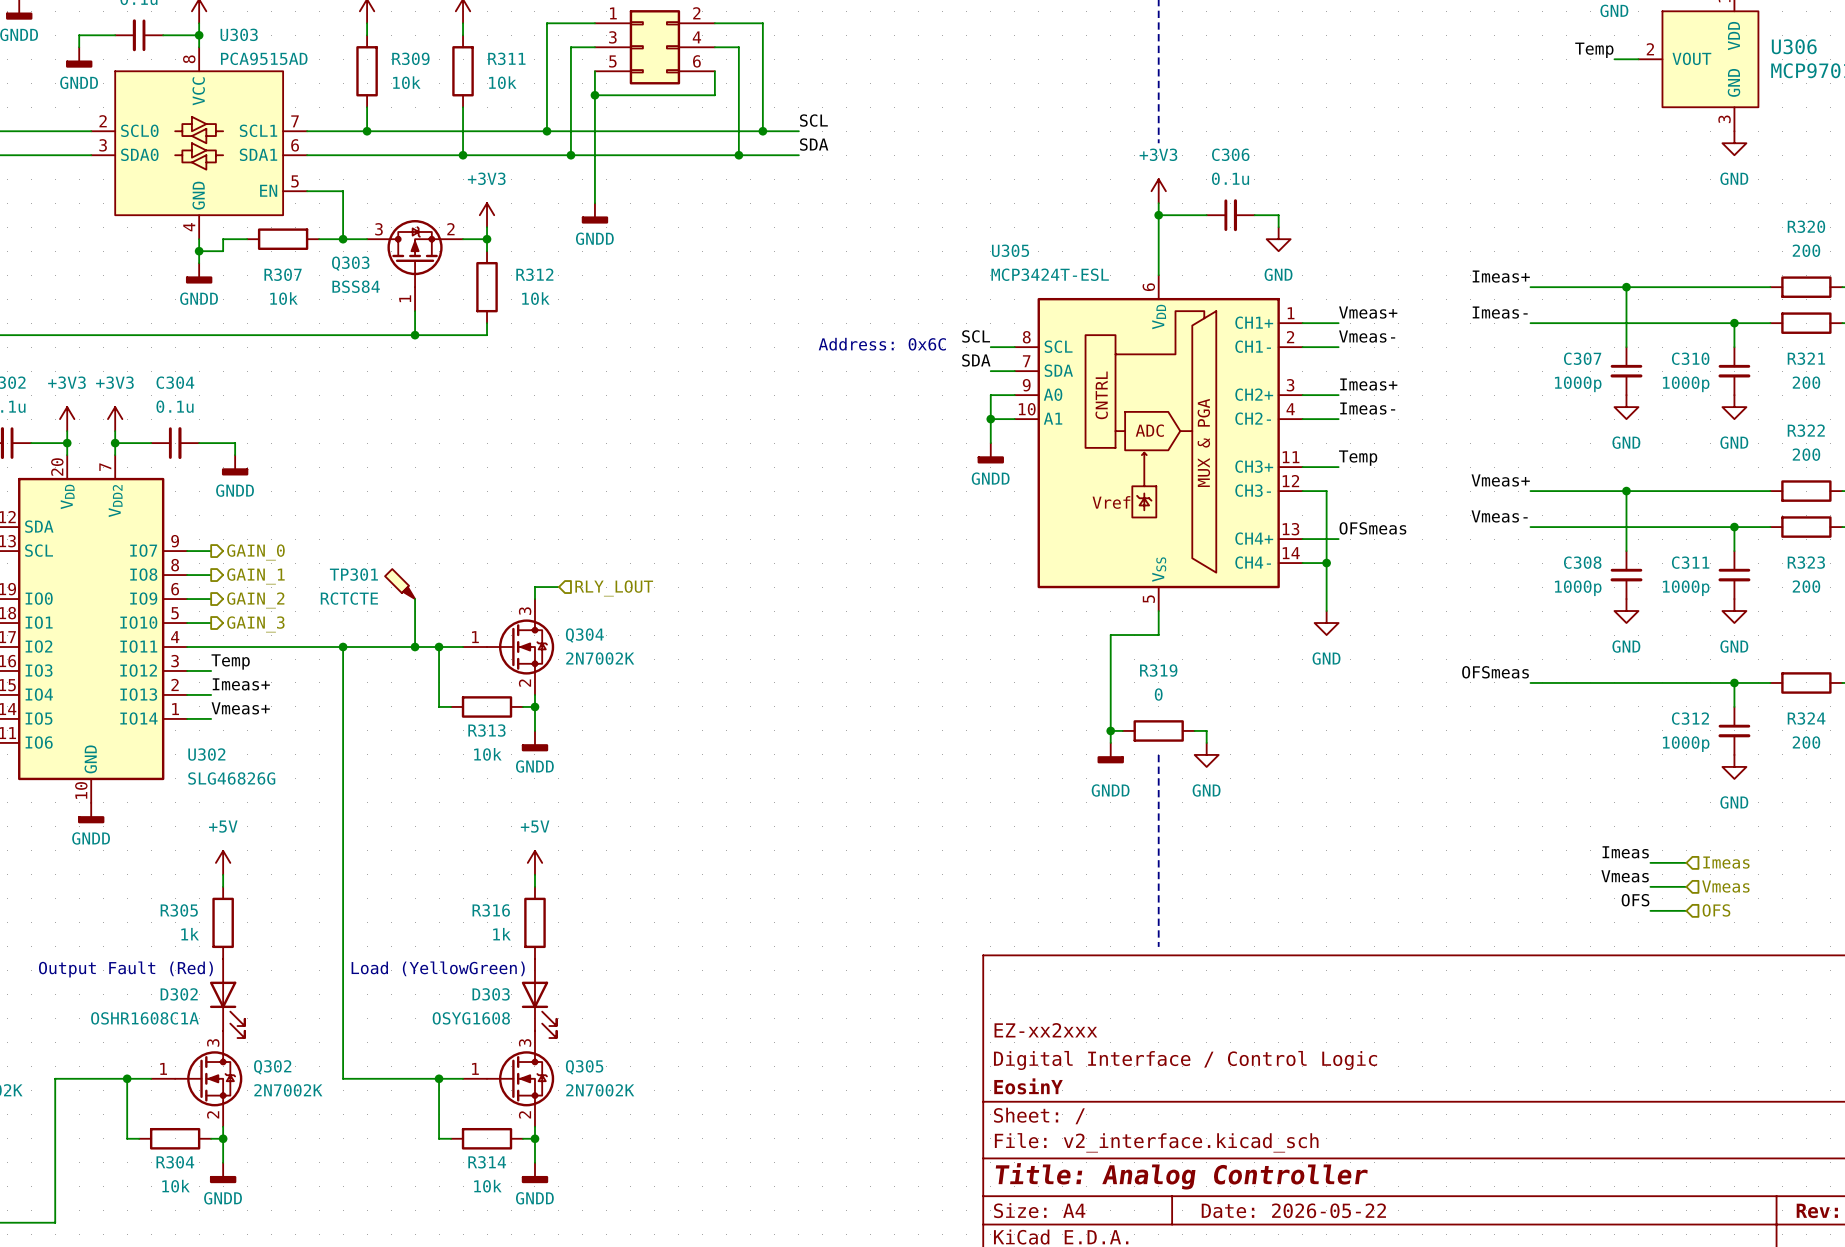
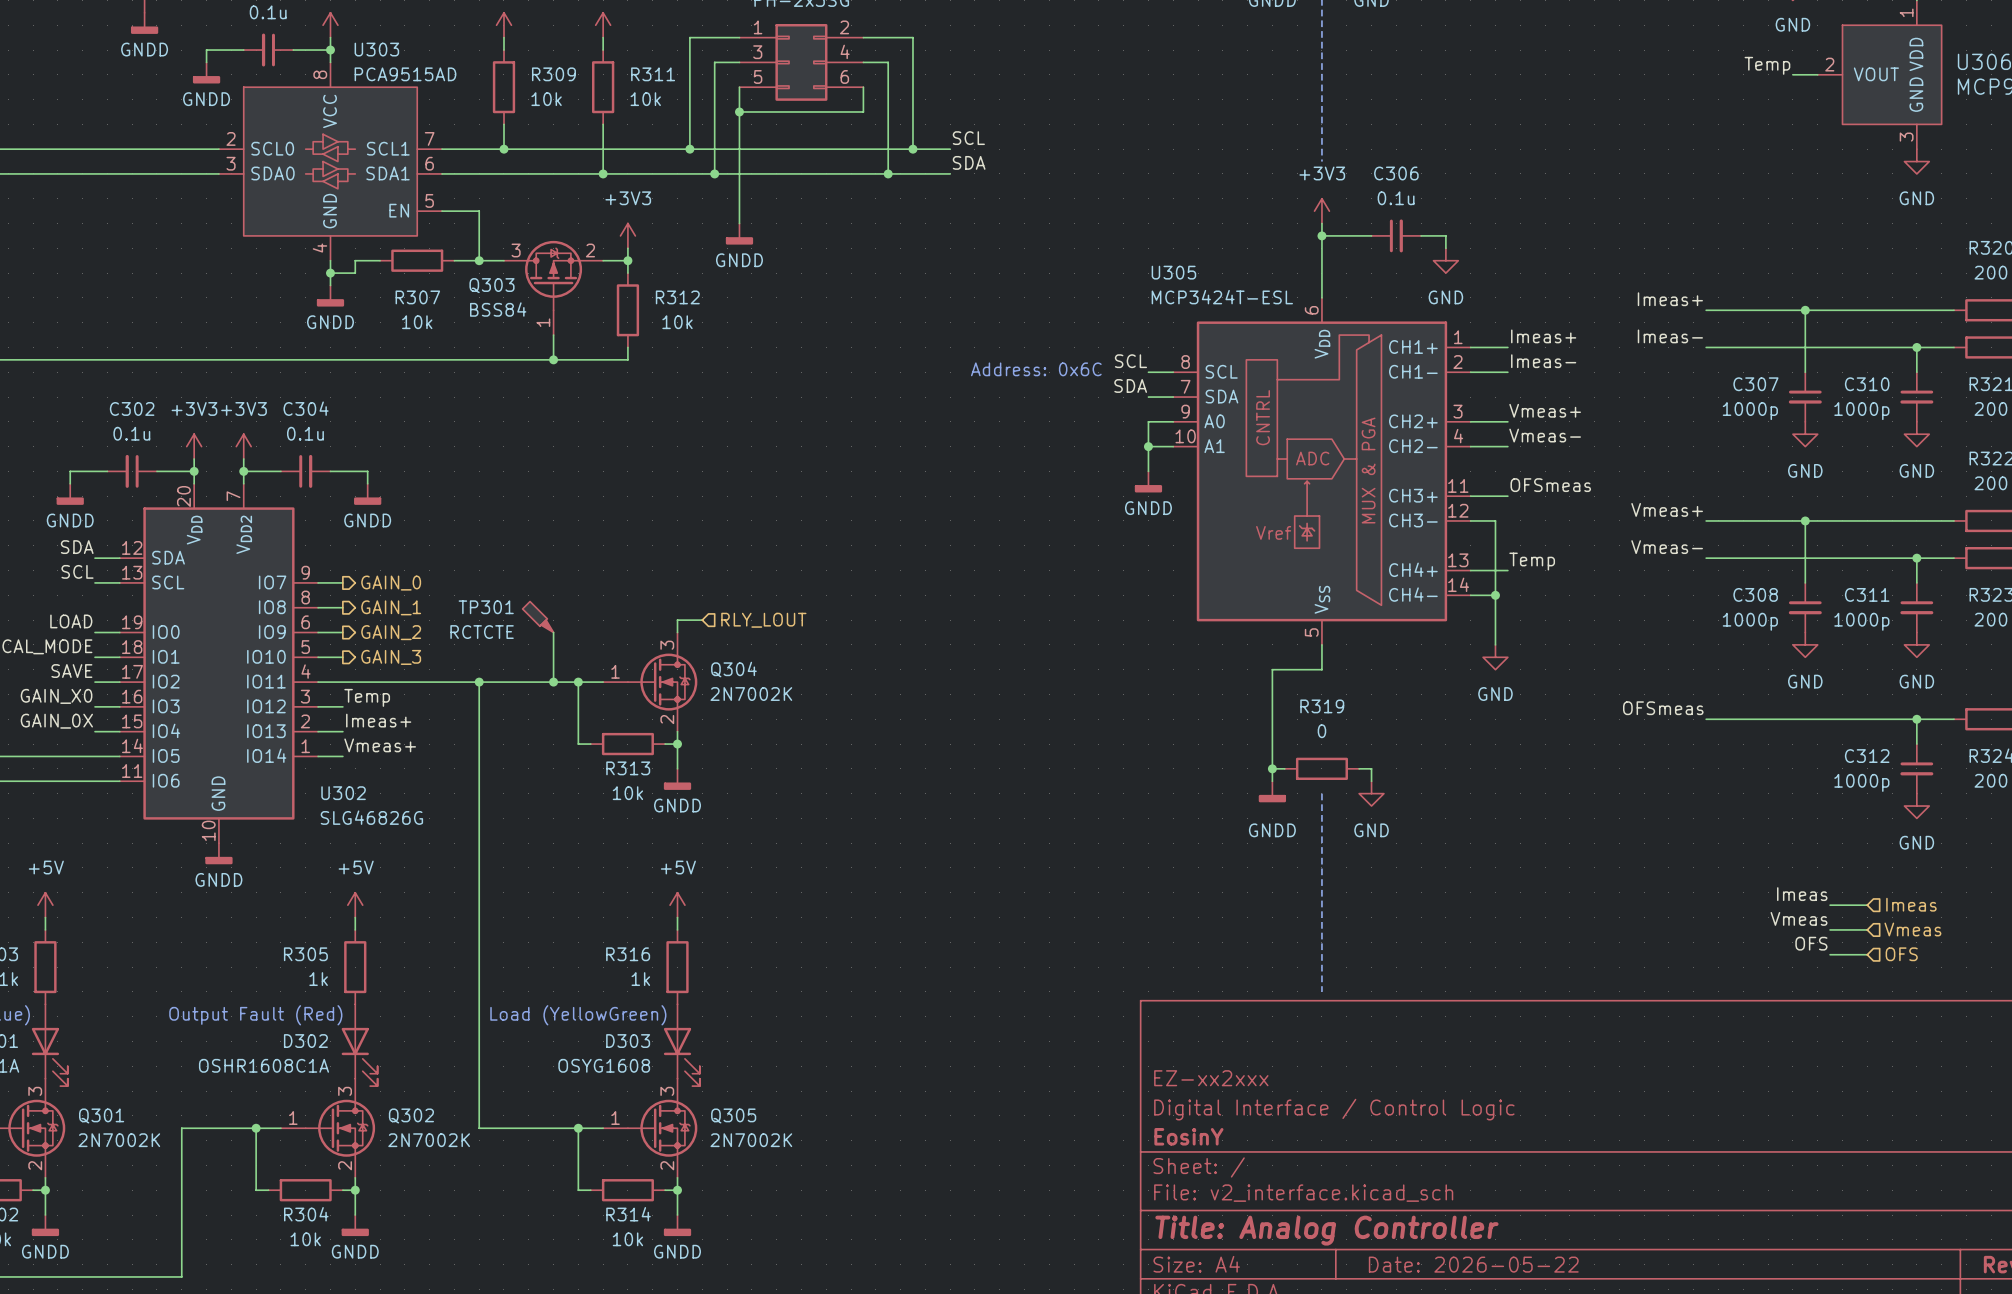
label: Vmeas+ (1368, 312) -> Imeas+ (1543, 336)
label: Vmeas- (1367, 336) -> Imeas- (1543, 361)
label: Imeas+ (1368, 384) -> Vmeas+ (1545, 410)
label: Imeas- (1367, 408) -> Vmeas- (1545, 435)
label: Temp (1358, 458) -> OFSmeas (1550, 485)
label: OFSmeas (1372, 528) -> Temp (1532, 561)

